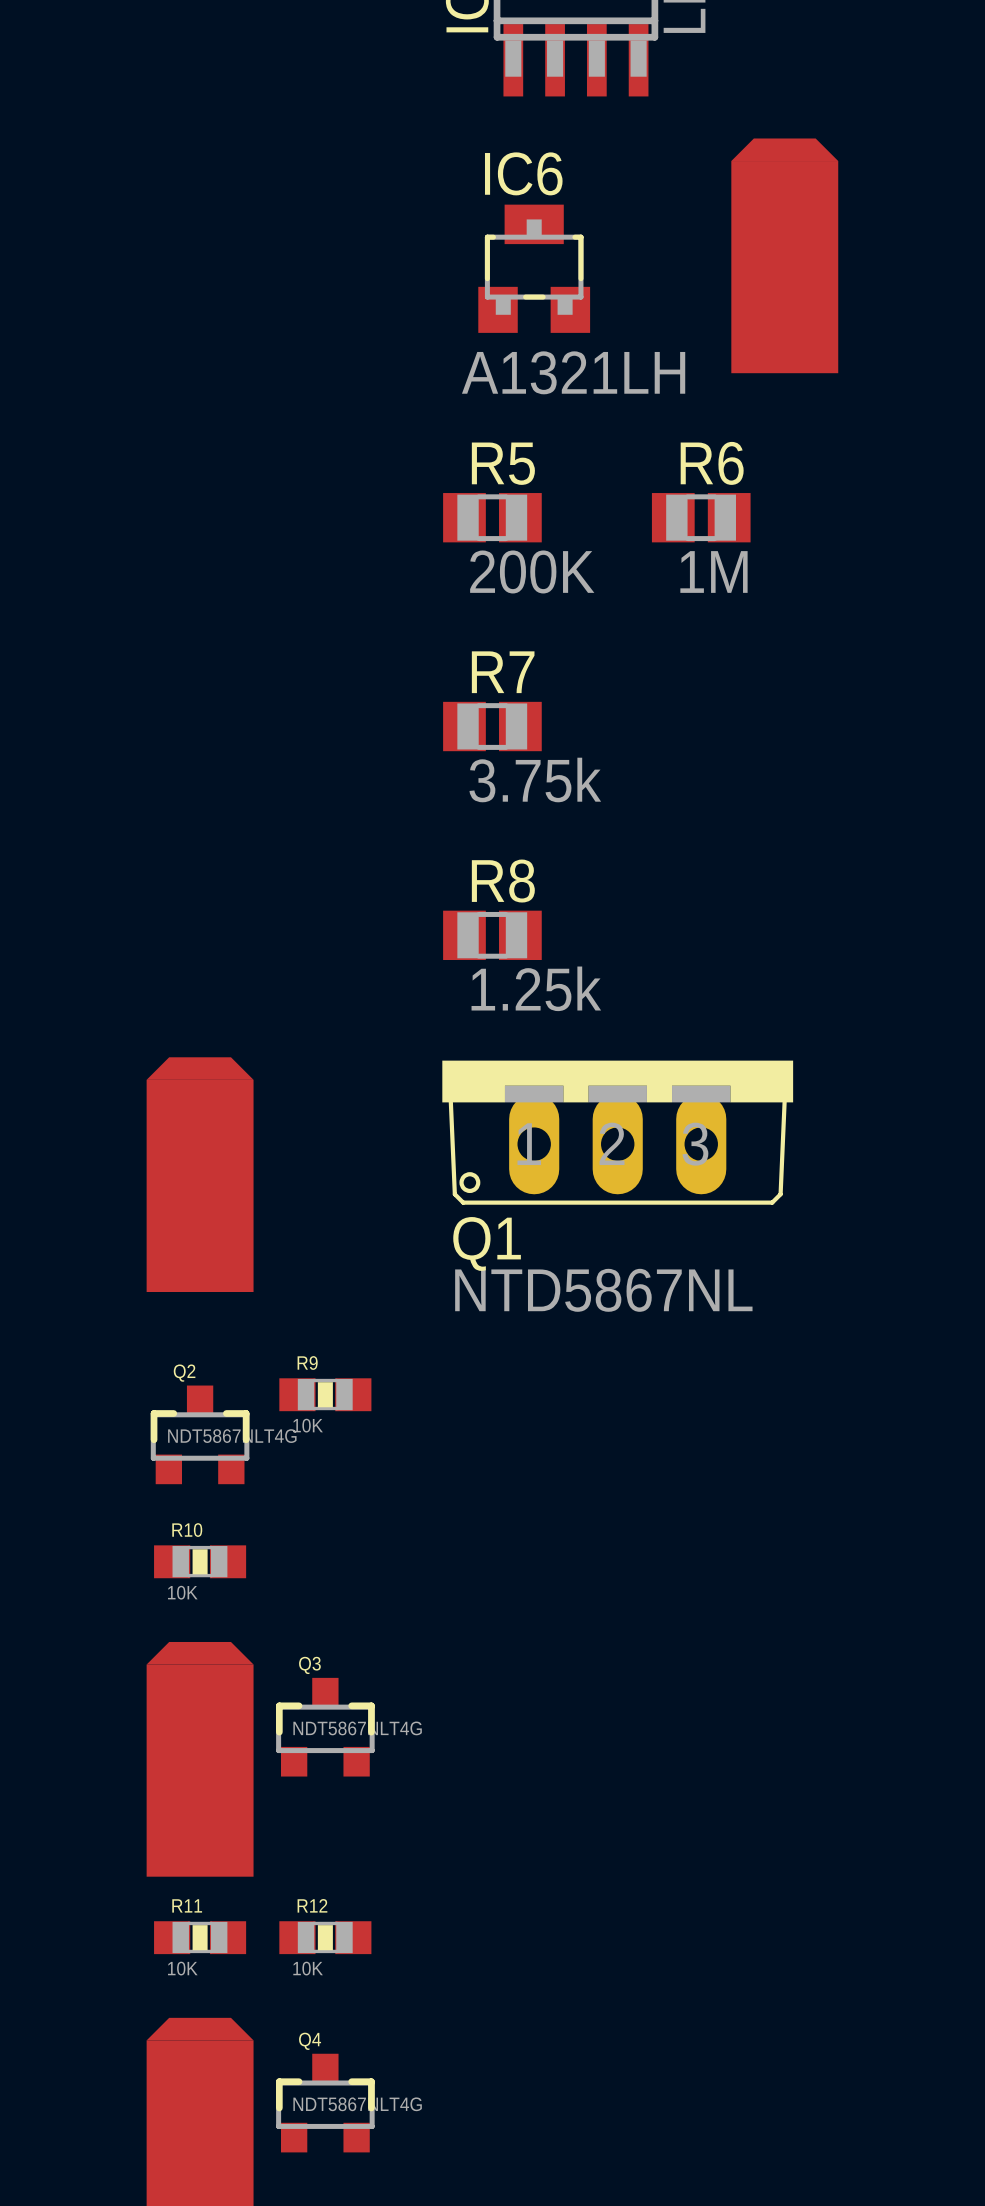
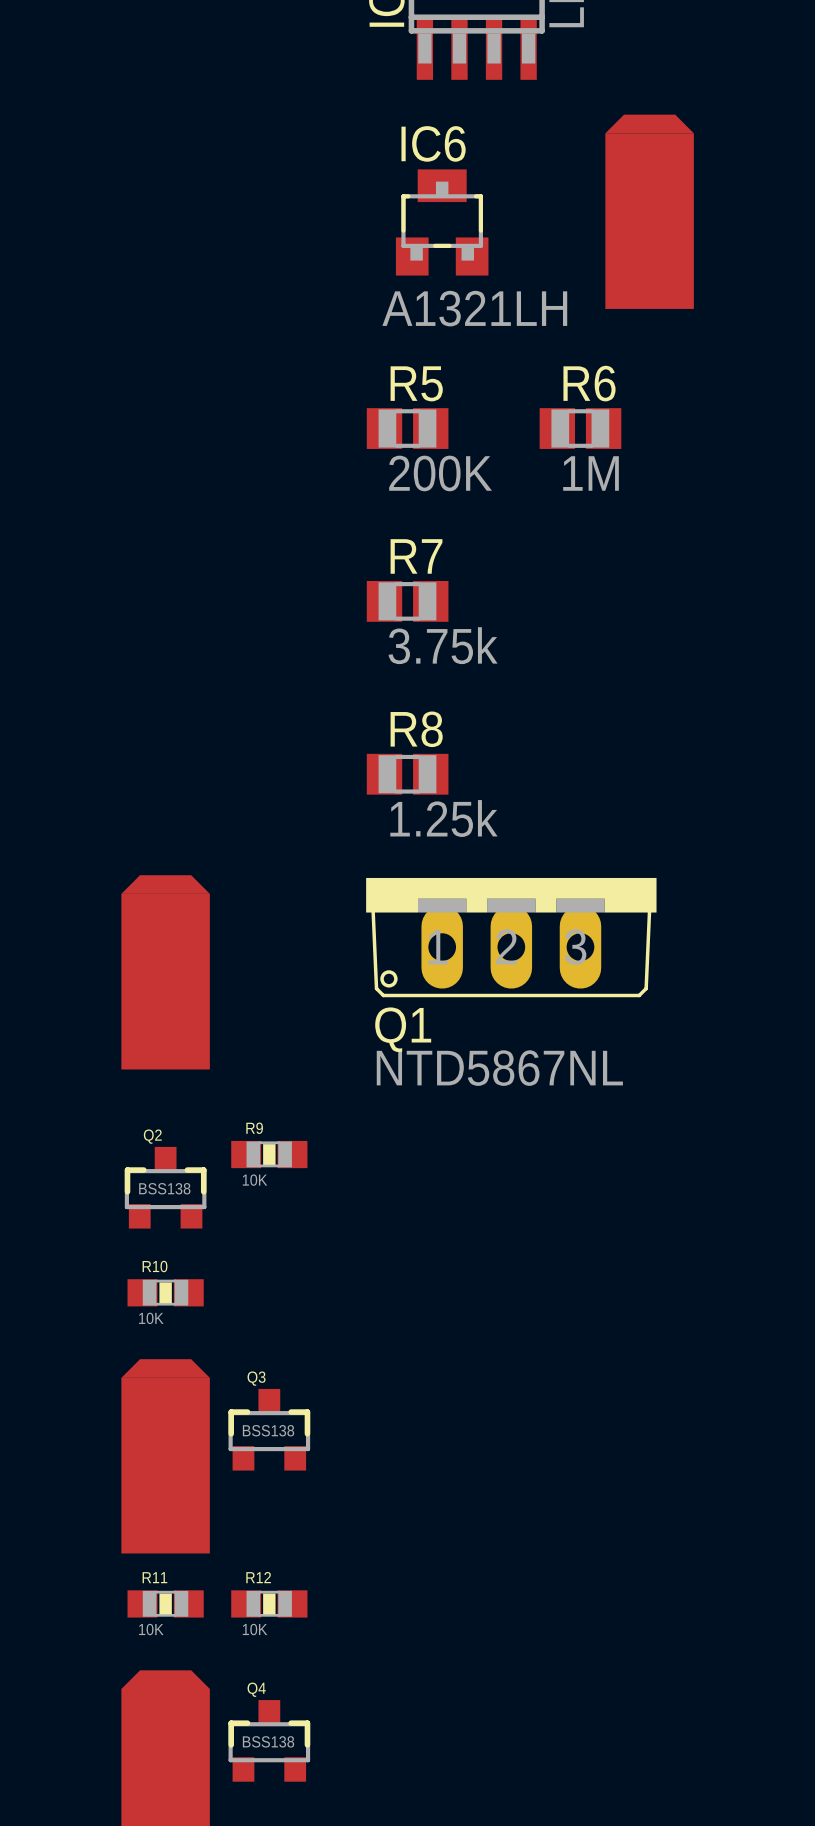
Q2 value: NDT5867NLT4G (232, 1436) -> BSS138 (164, 1188)
Q3 value: NDT5867NLT4G (357, 1728) -> BSS138 (268, 1430)
Q4 value: NDT5867NLT4G (357, 2104) -> BSS138 (268, 1741)

